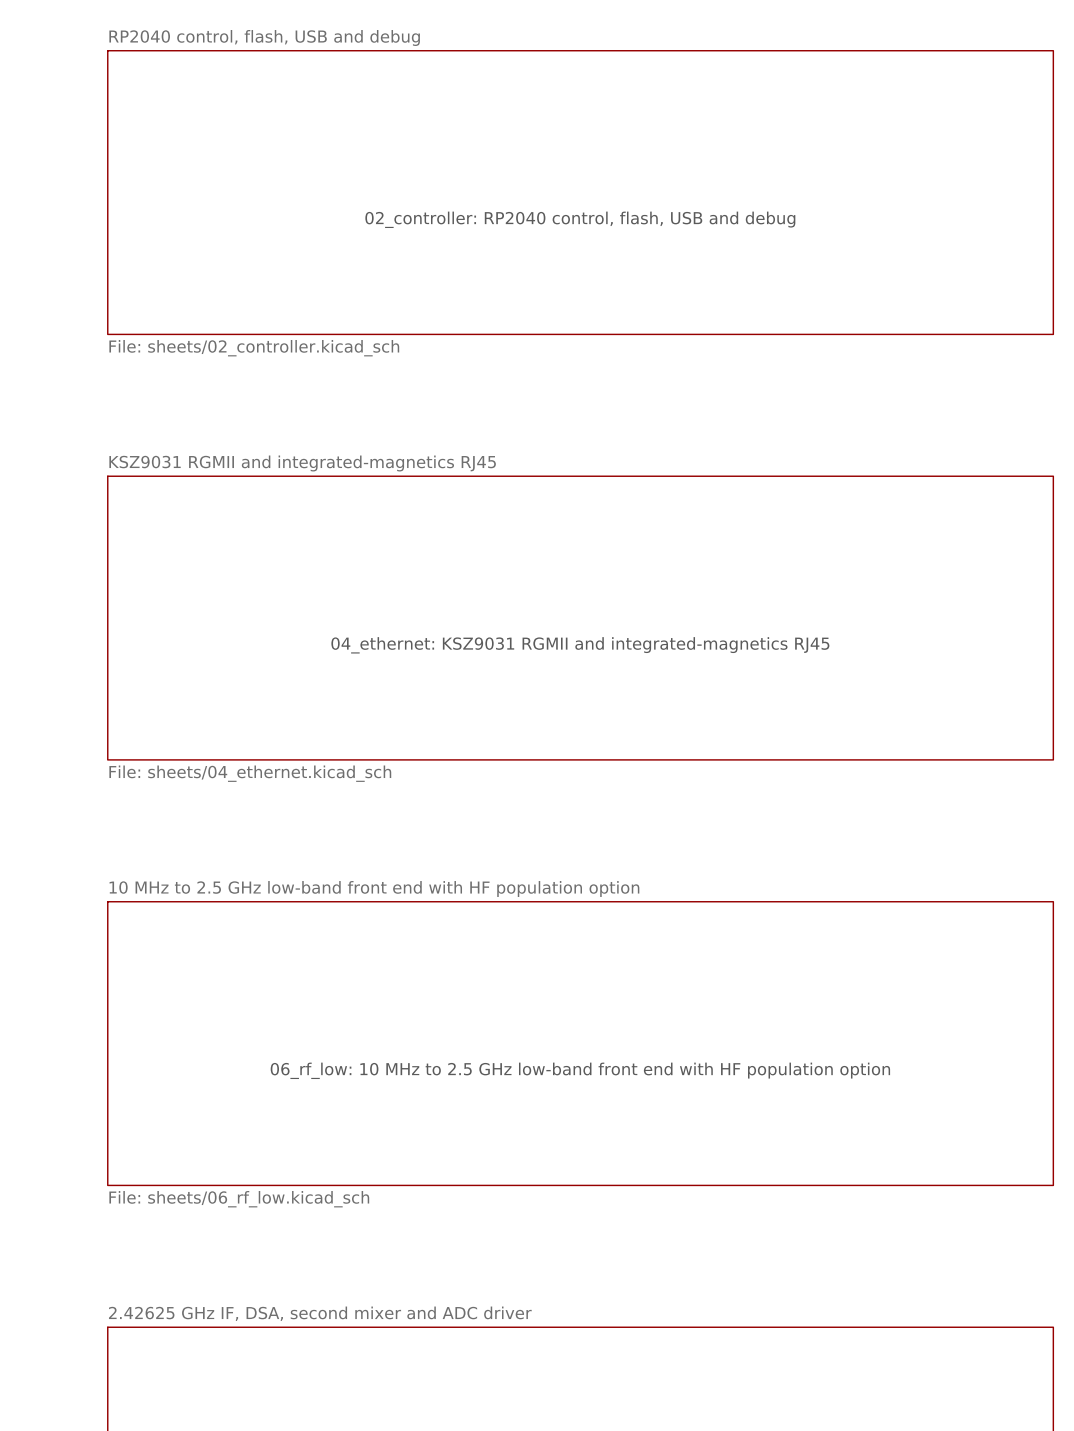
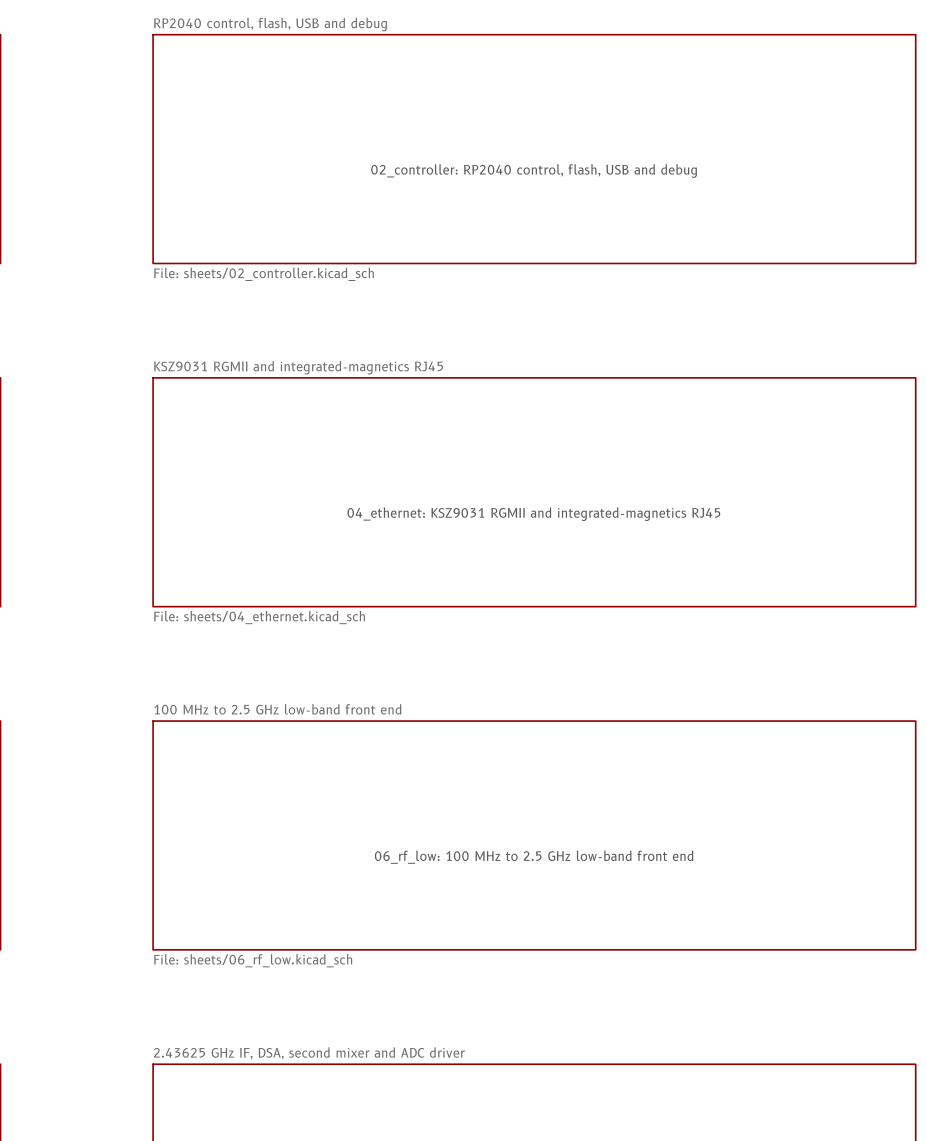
sheet 10 MHz to 2.5 GHz low-band front end with HF population option name: 10 MHz to 2.5 GHz low-band front end with HF population option (374, 889) -> 100 MHz to 2.5 GHz low-band front end (277, 709)
text: 06_rf_low: 10 MHz to 2.5 GHz low-band front end with HF population option (580, 1070) -> 06_rf_low: 100 MHz to 2.5 GHz low-band front end (534, 857)
sheet 2.42625 GHz IF, DSA, second mixer and ADC driver name: 2.42625 GHz IF, DSA, second mixer and ADC driver (320, 1313) -> 2.43625 GHz IF, DSA, second mixer and ADC driver (309, 1053)

